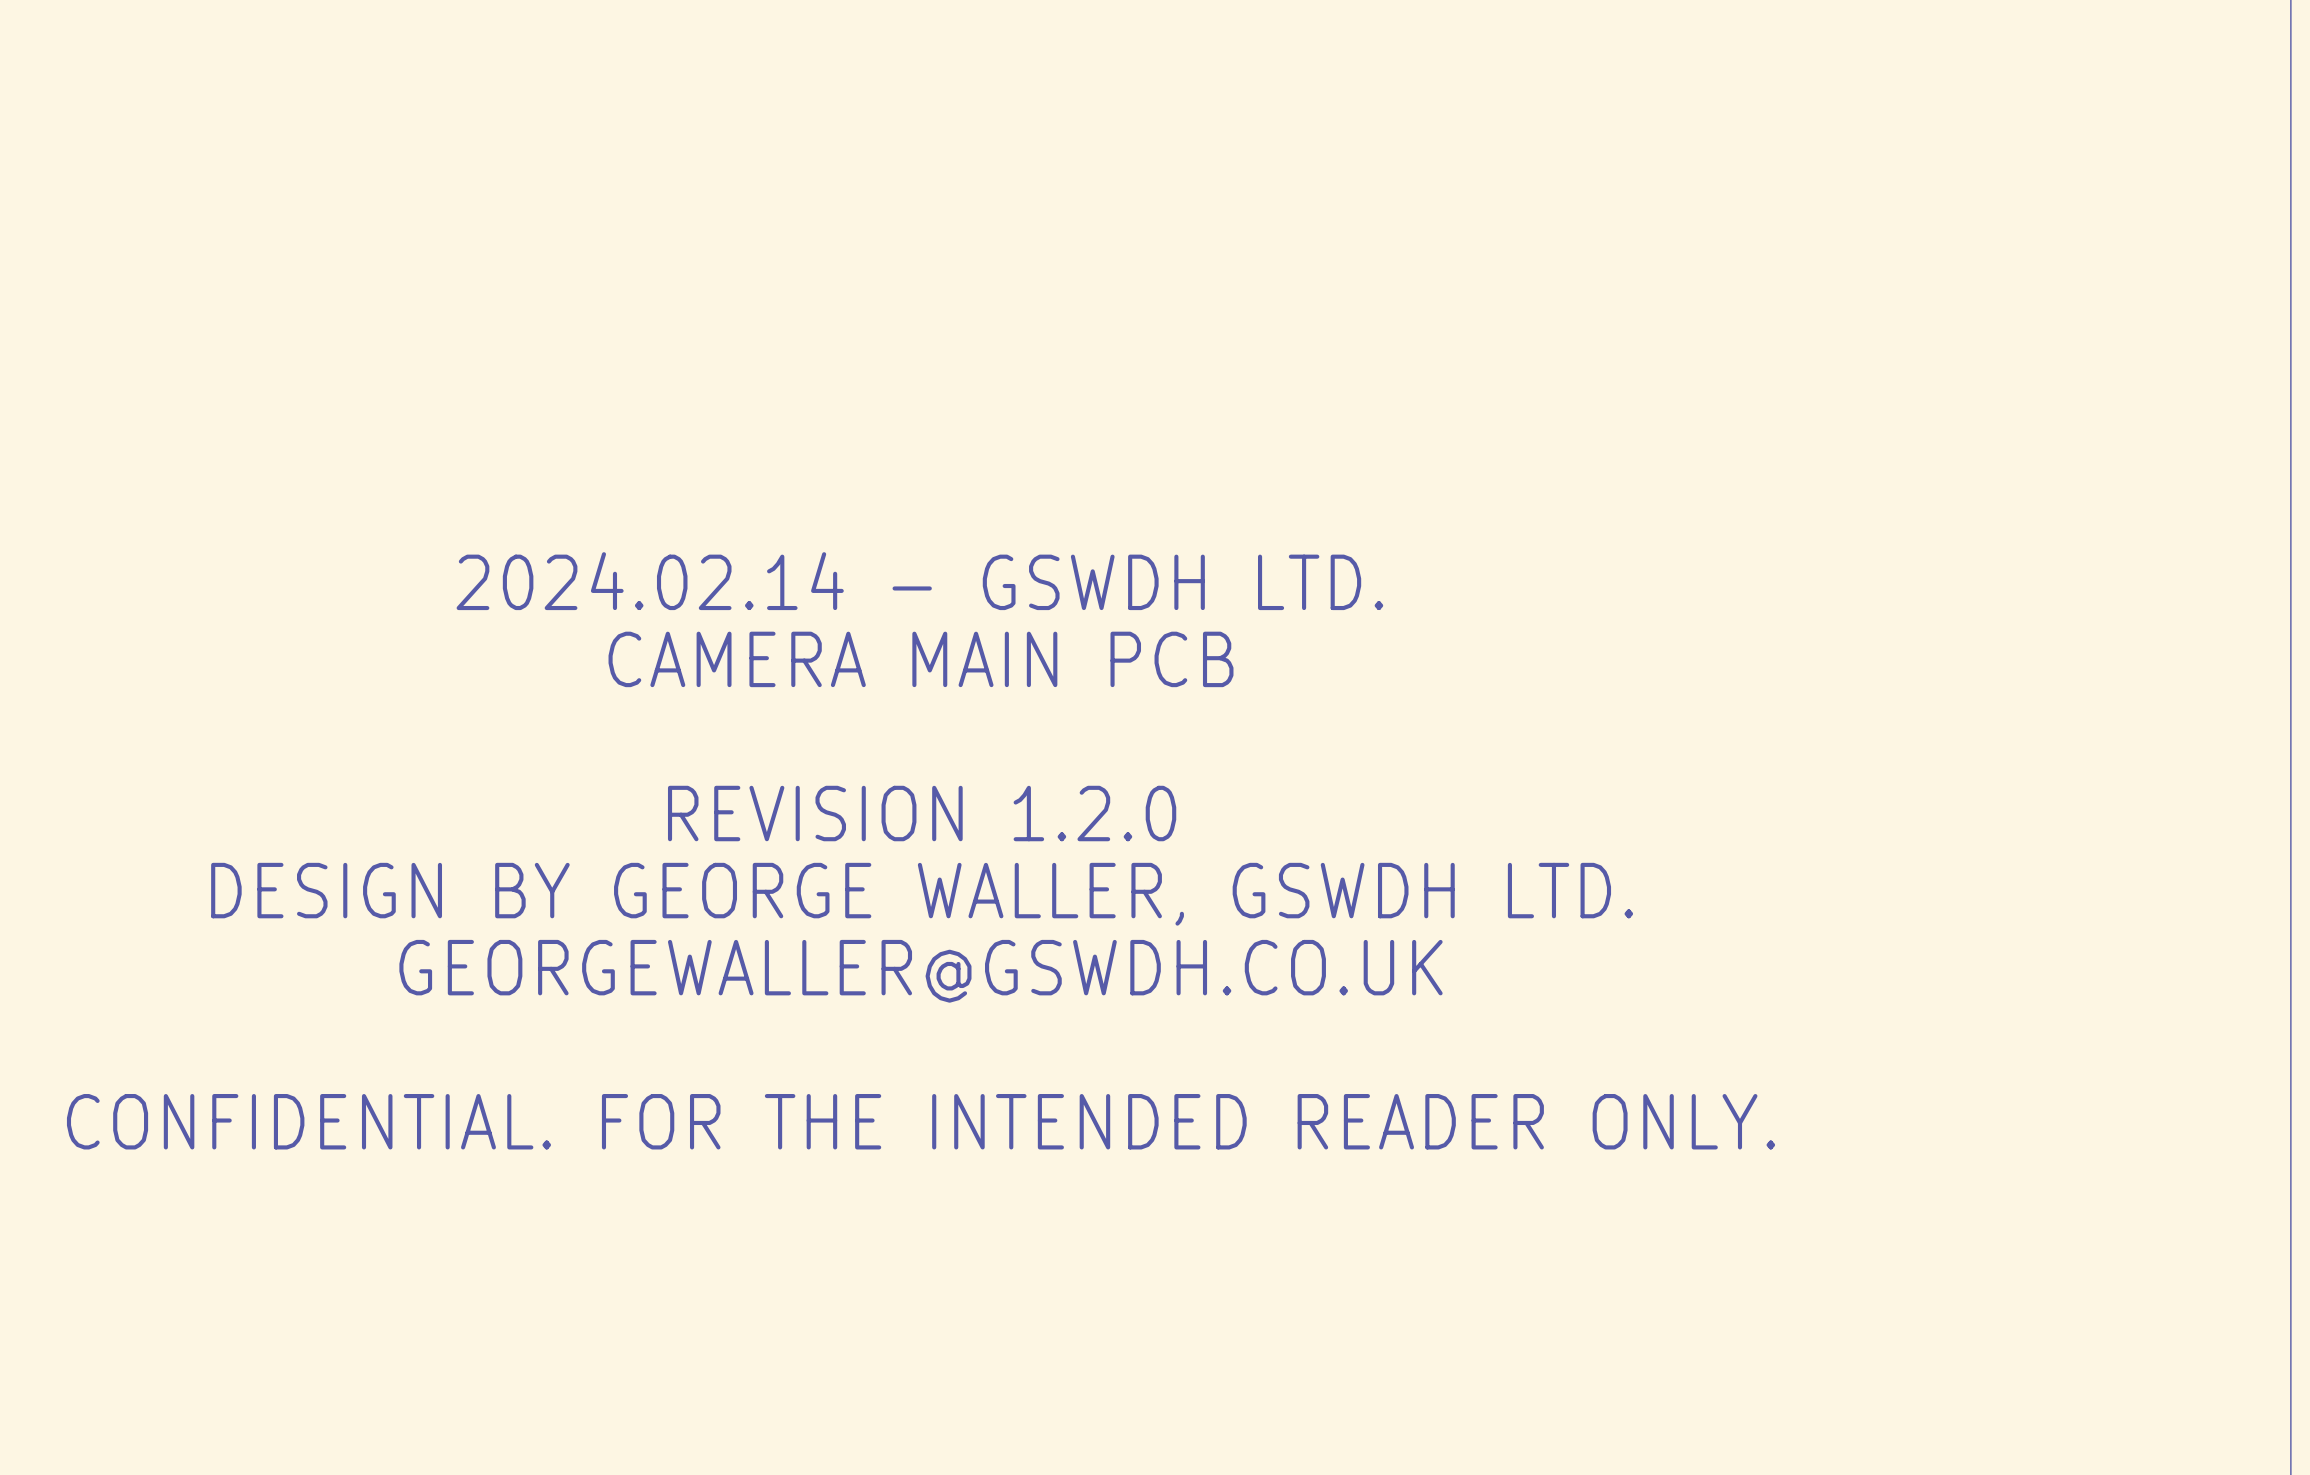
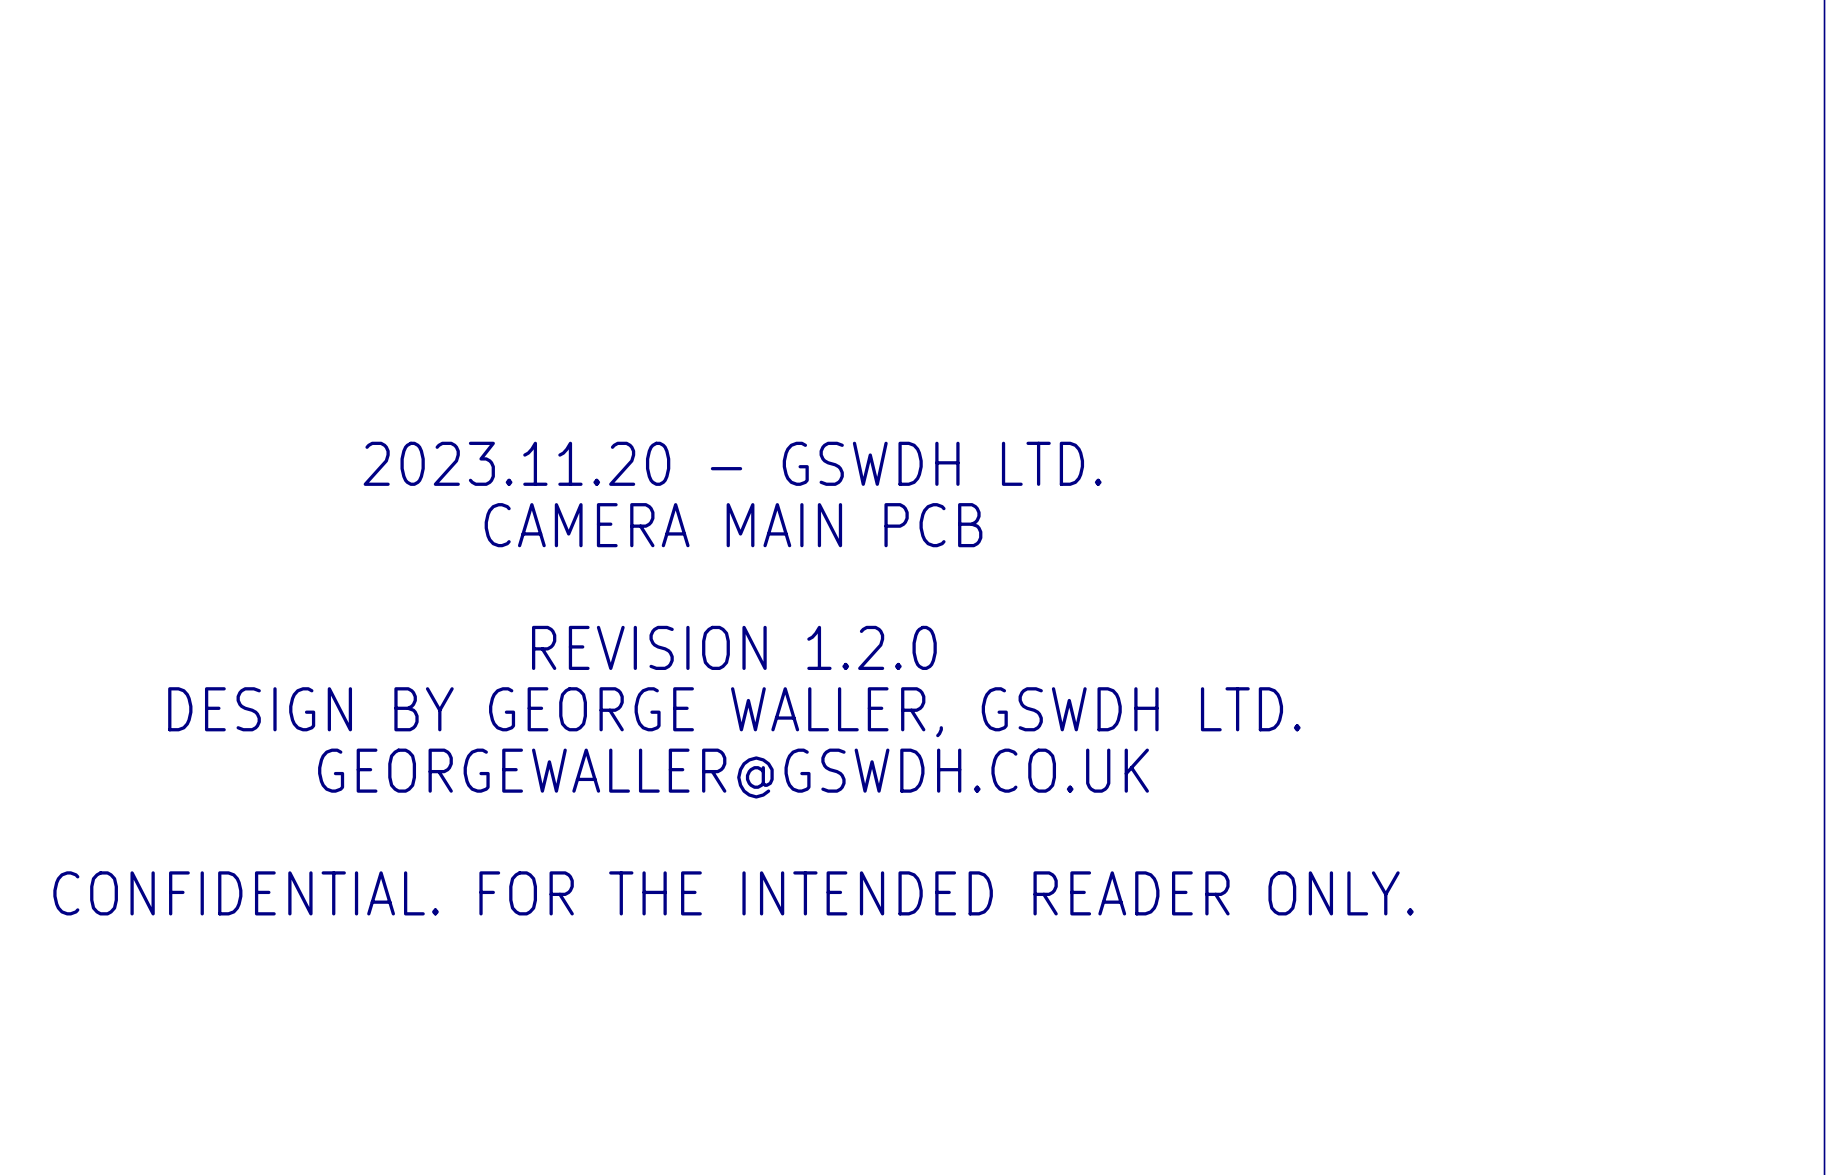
text: 2024.02.14 - GSWDH LTD. (919, 581) -> 2023.11.20 - GSWDH LTD. (732, 463)

